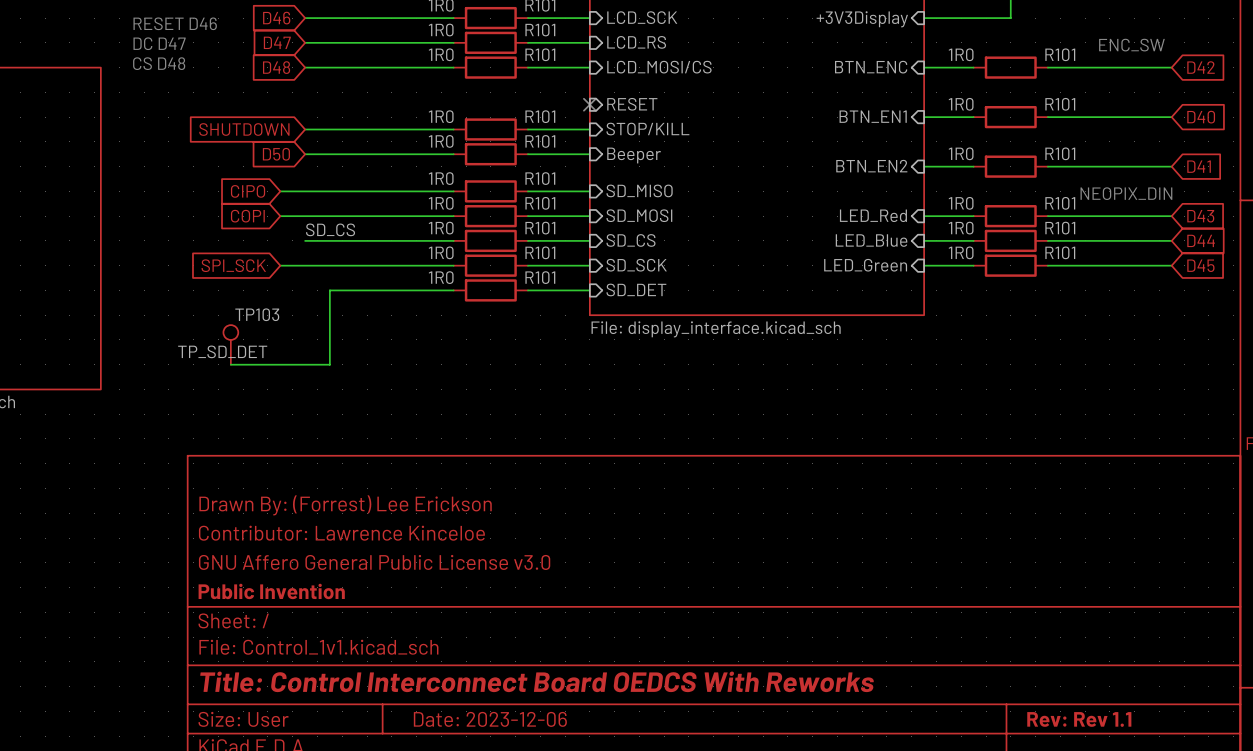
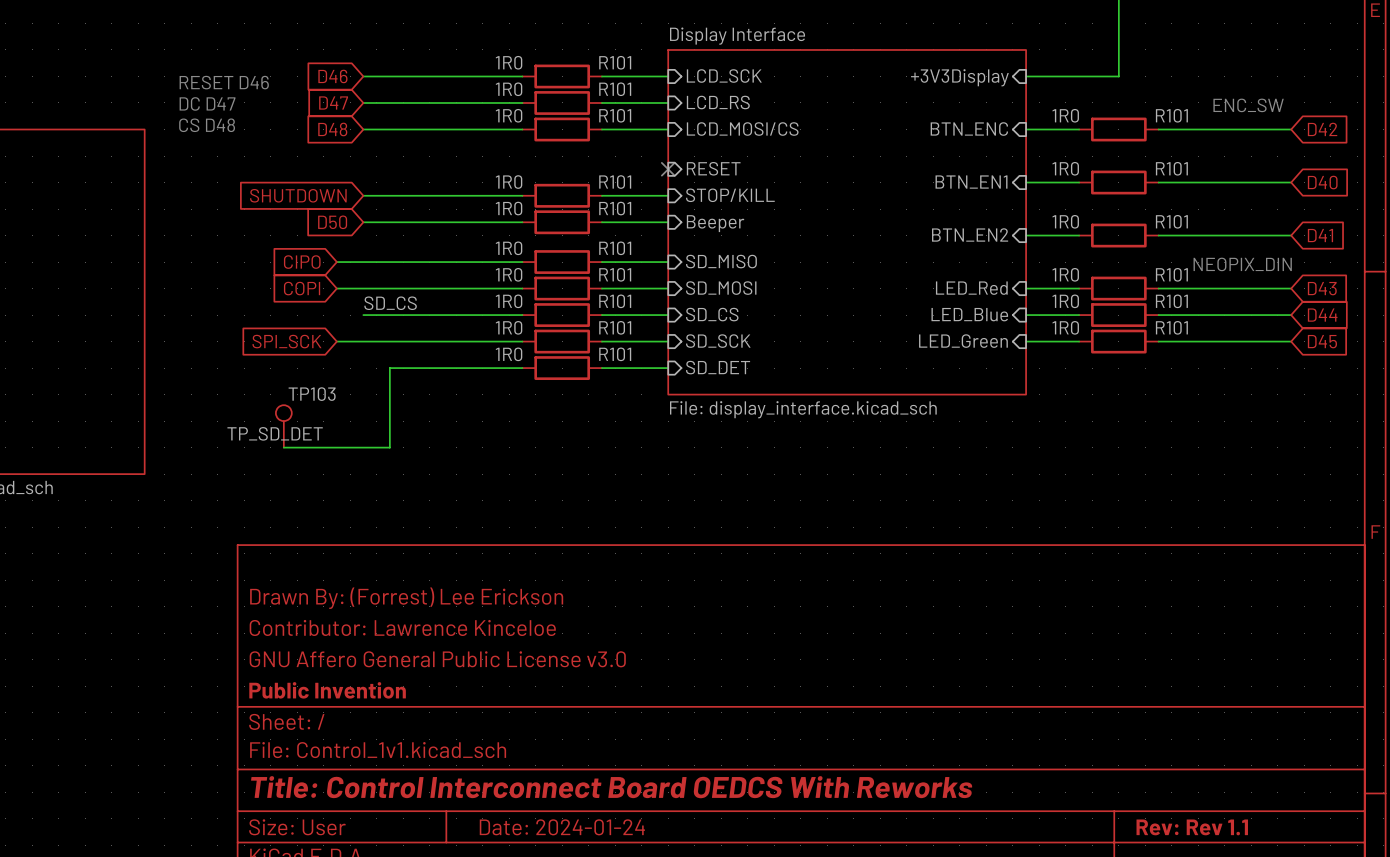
title block: Date: 2023-12-06 (490, 719) -> Date: 2024-01-24 (562, 827)

